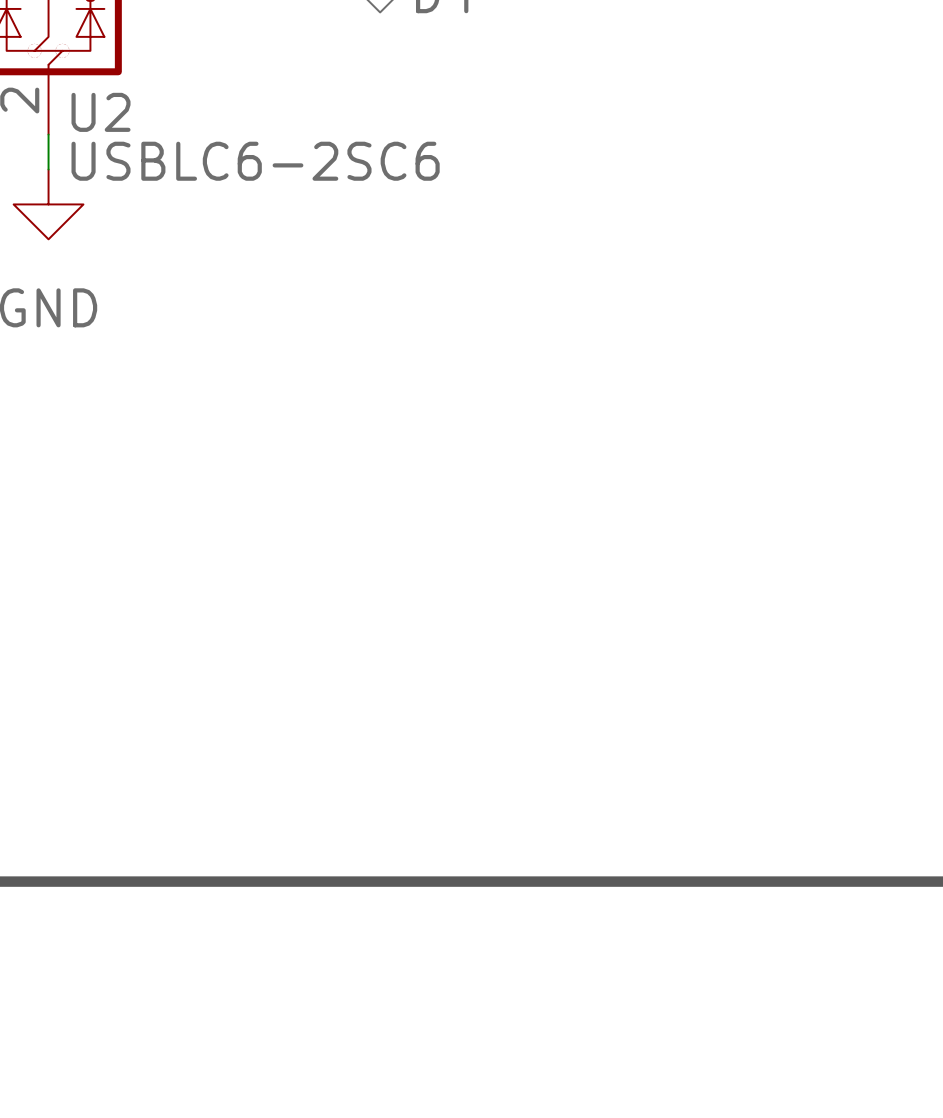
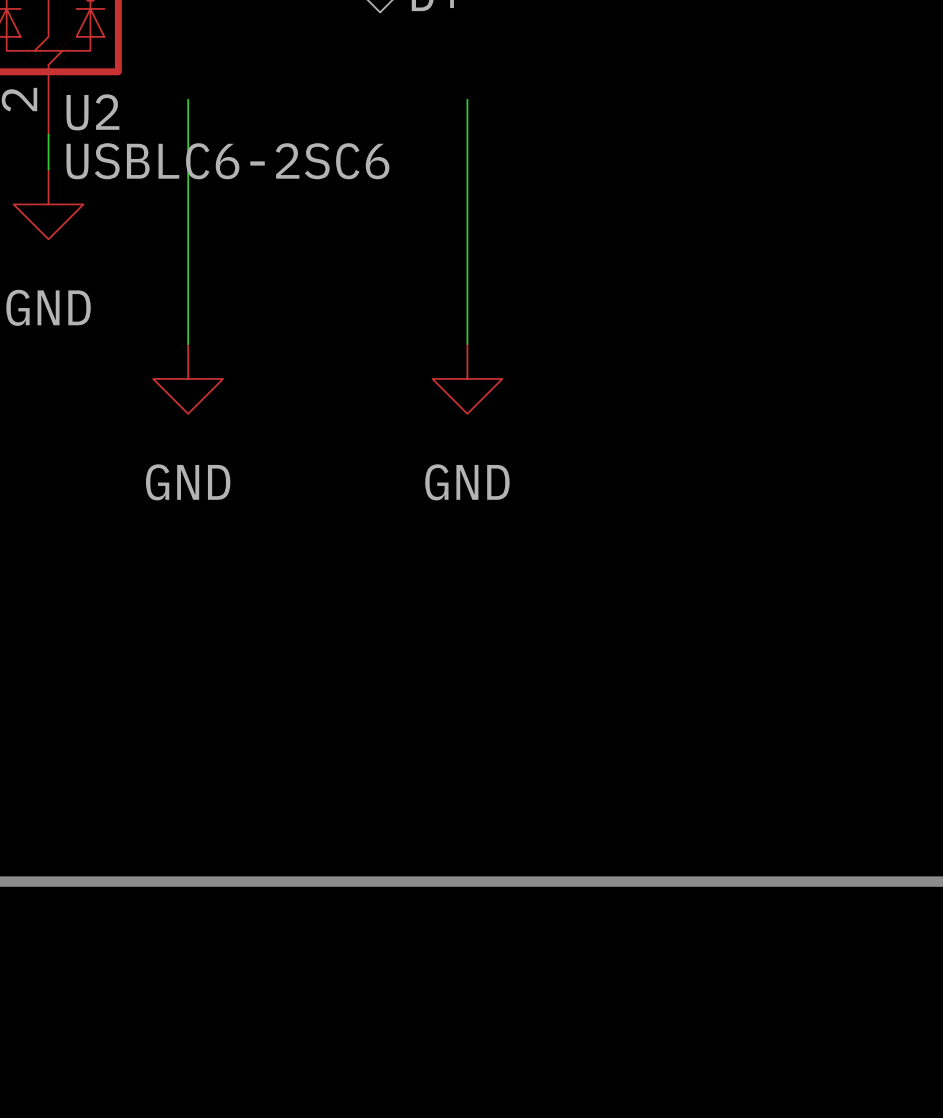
wire: none -> (188, 99) (188, 344)
wire: none -> (467, 99) (467, 344)
power symbol: none -> GND (188, 378)
power symbol: none -> GND (467, 378)

